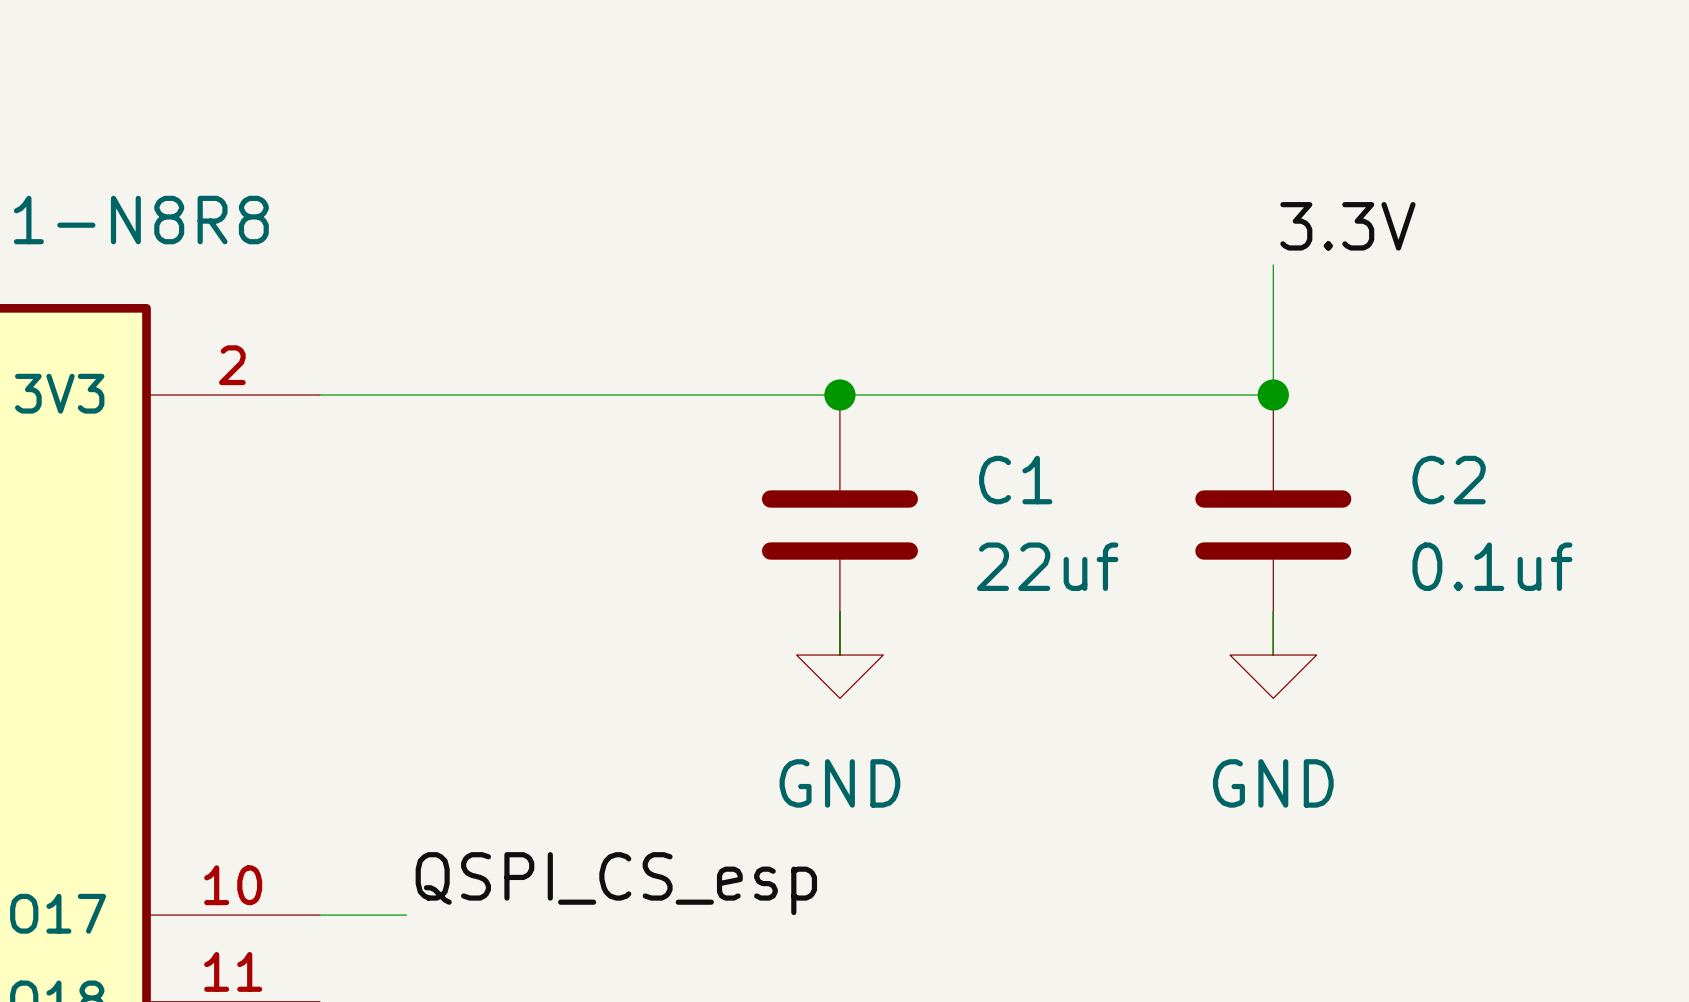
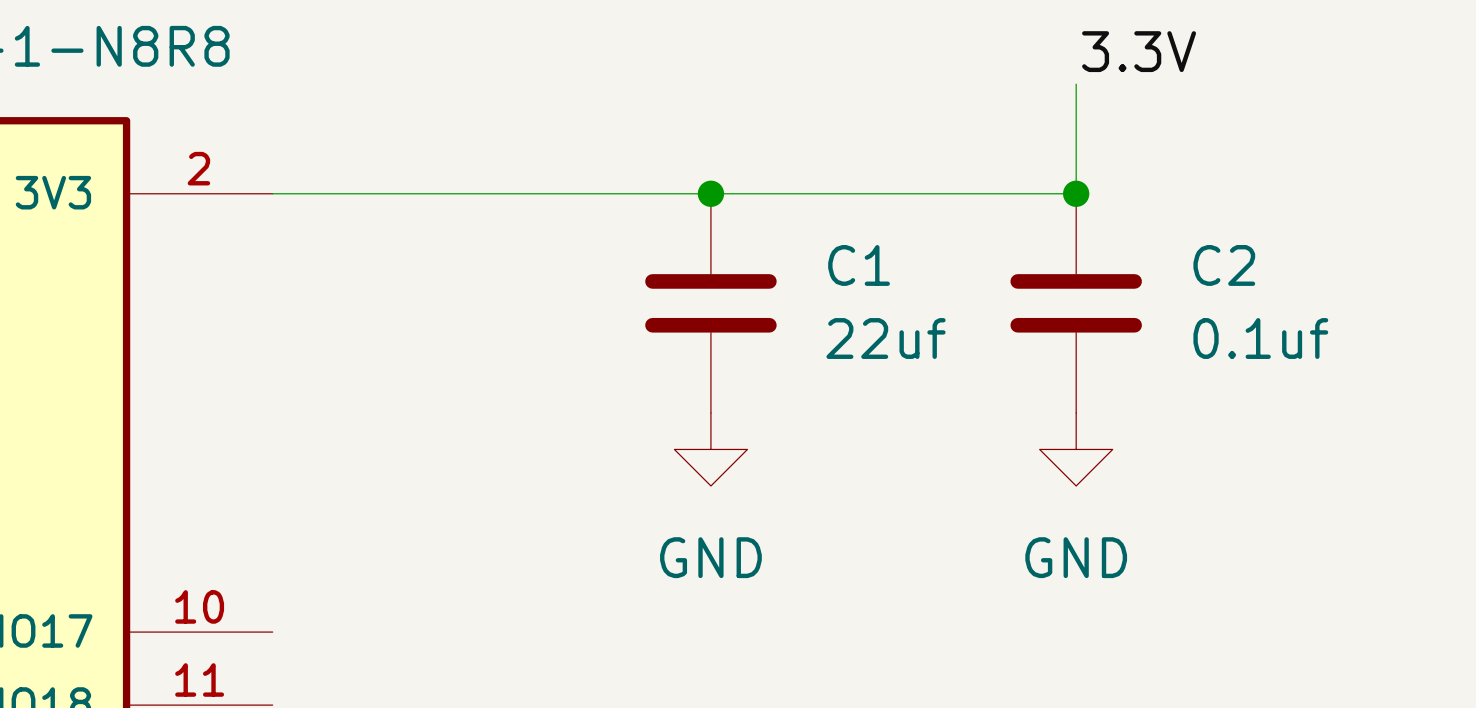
power symbol position: GND (839, 655) -> GND (710, 449)
power symbol position: GND (1273, 655) -> GND (1076, 449)
label: QSPI_CS_esp (616, 883) -> none
wire: (319, 915) (406, 915) -> none

